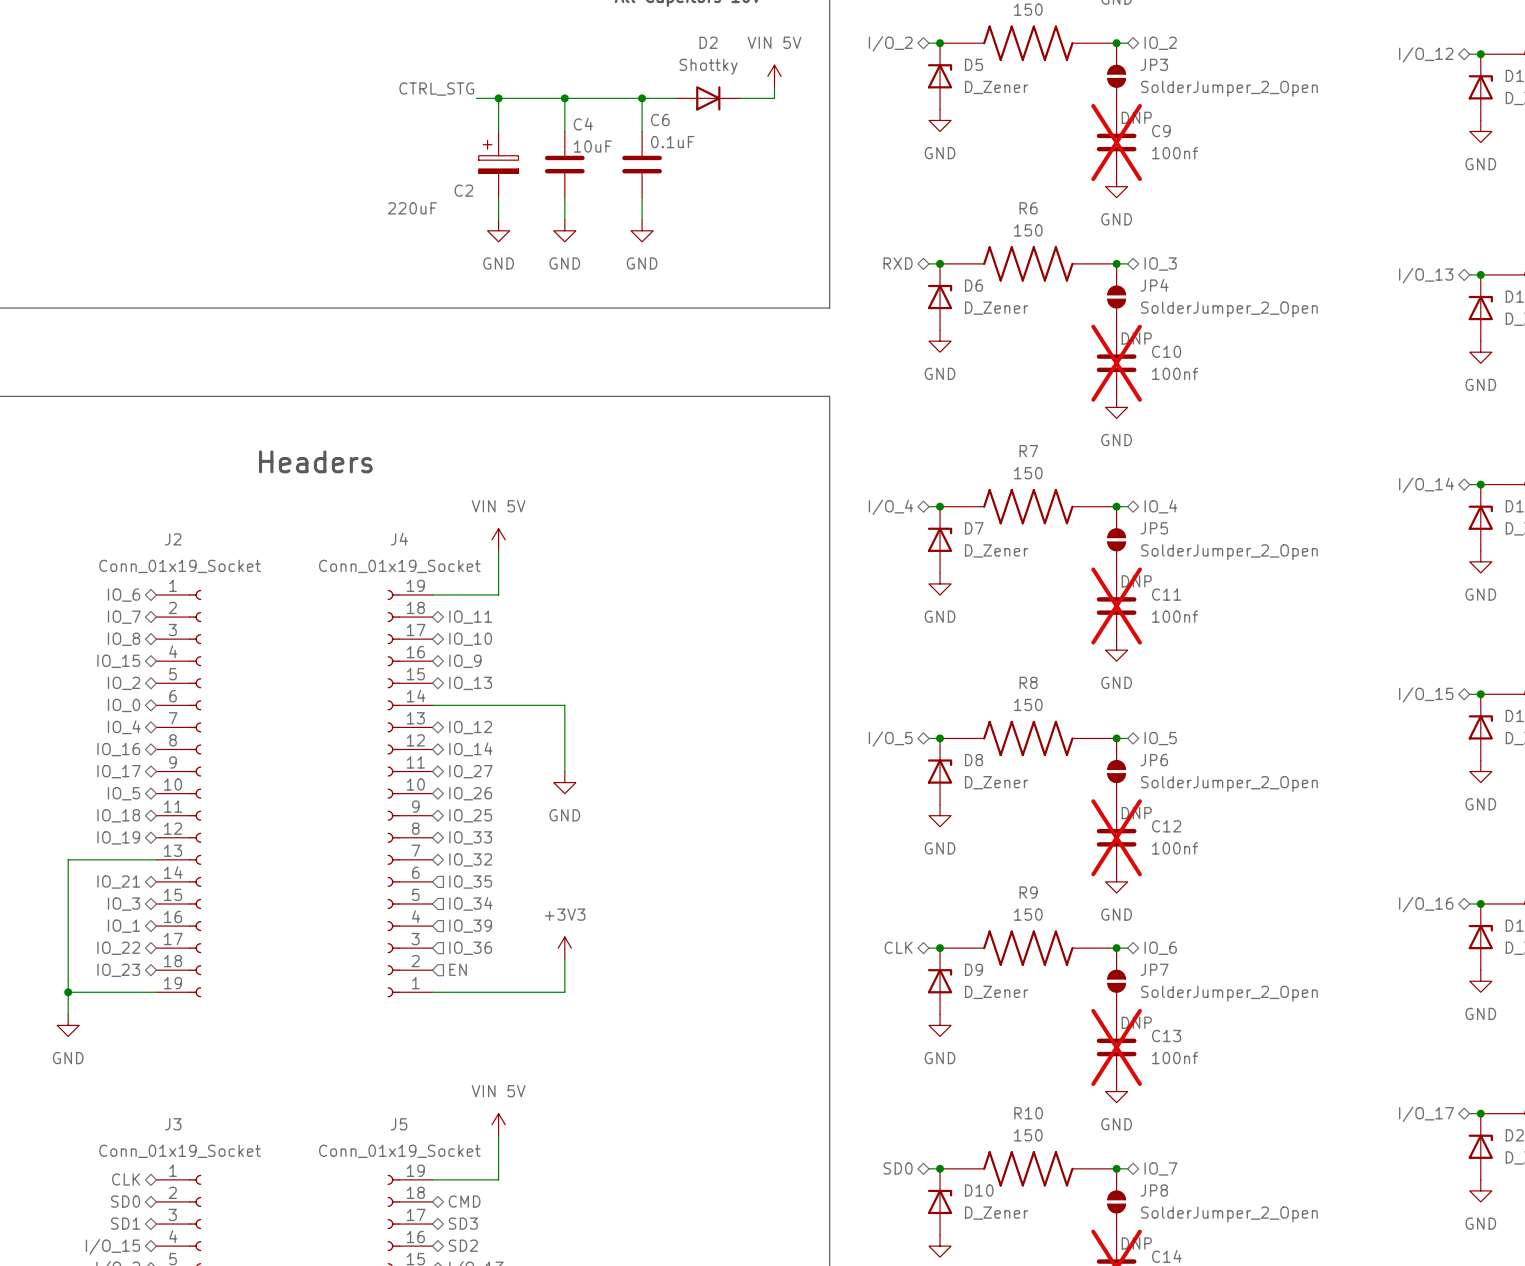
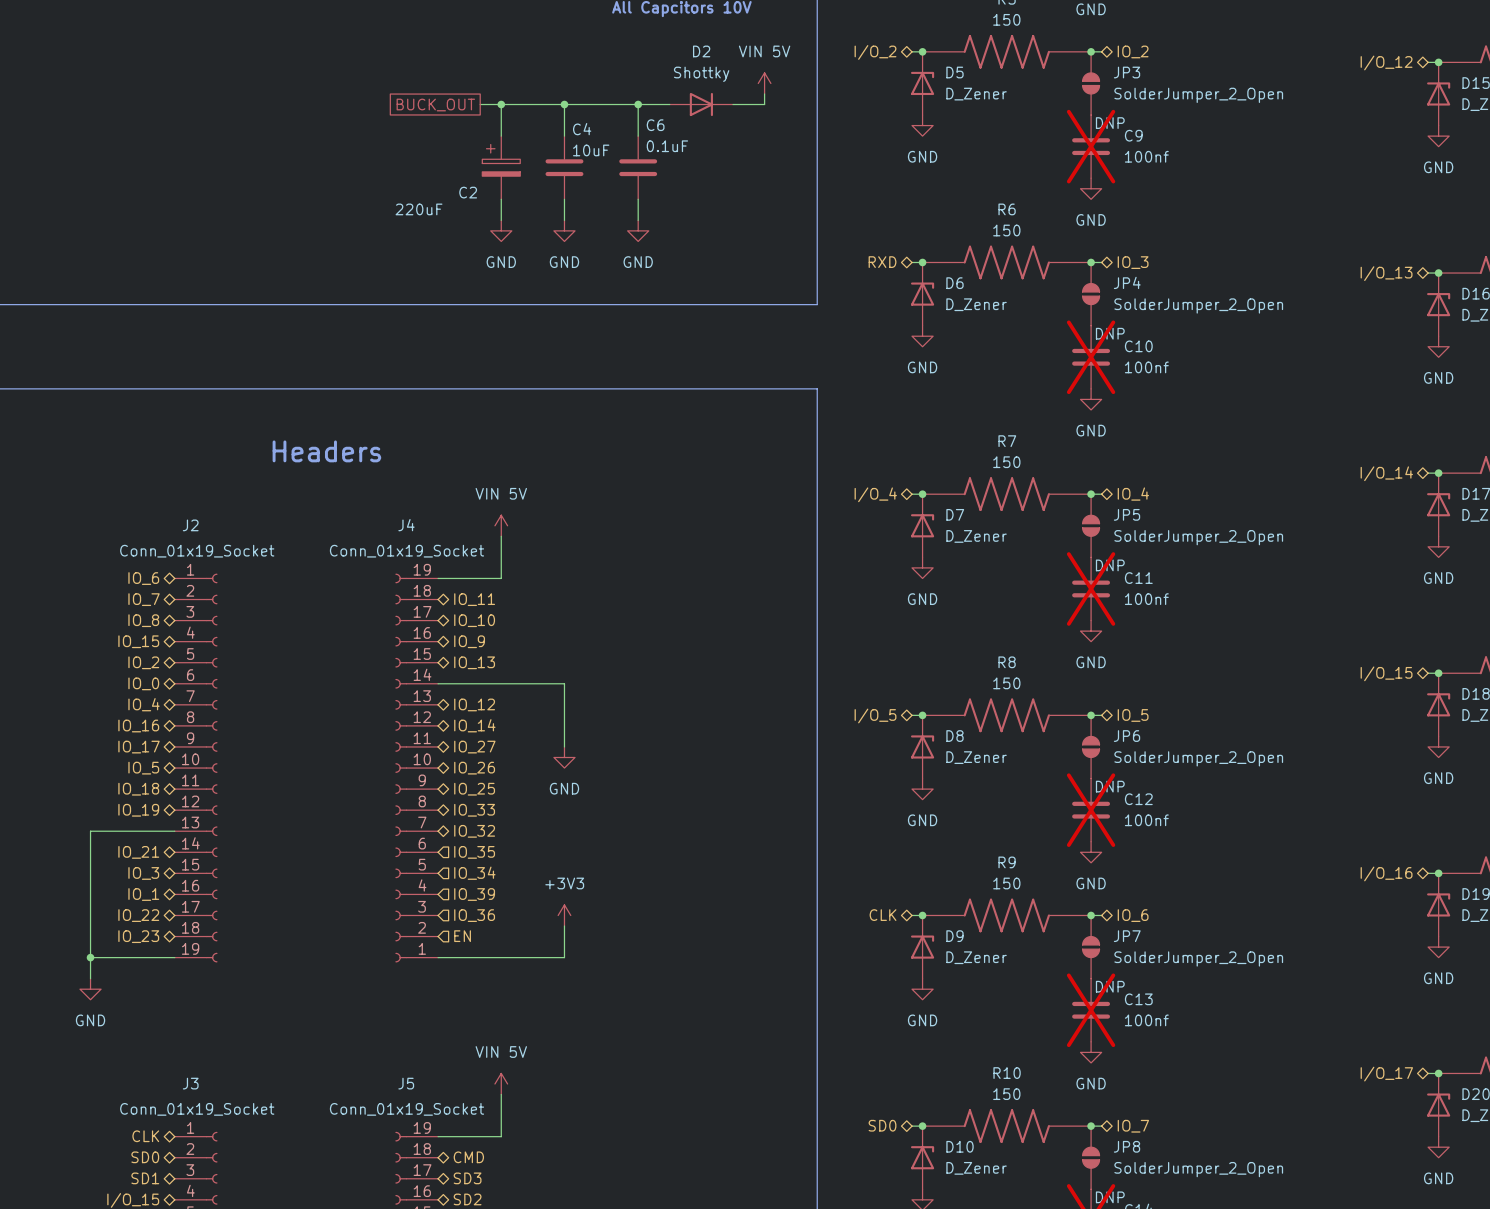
label: CTRL_STG (436, 89) -> none
global label: none -> BUCK_OUT (435, 105)

